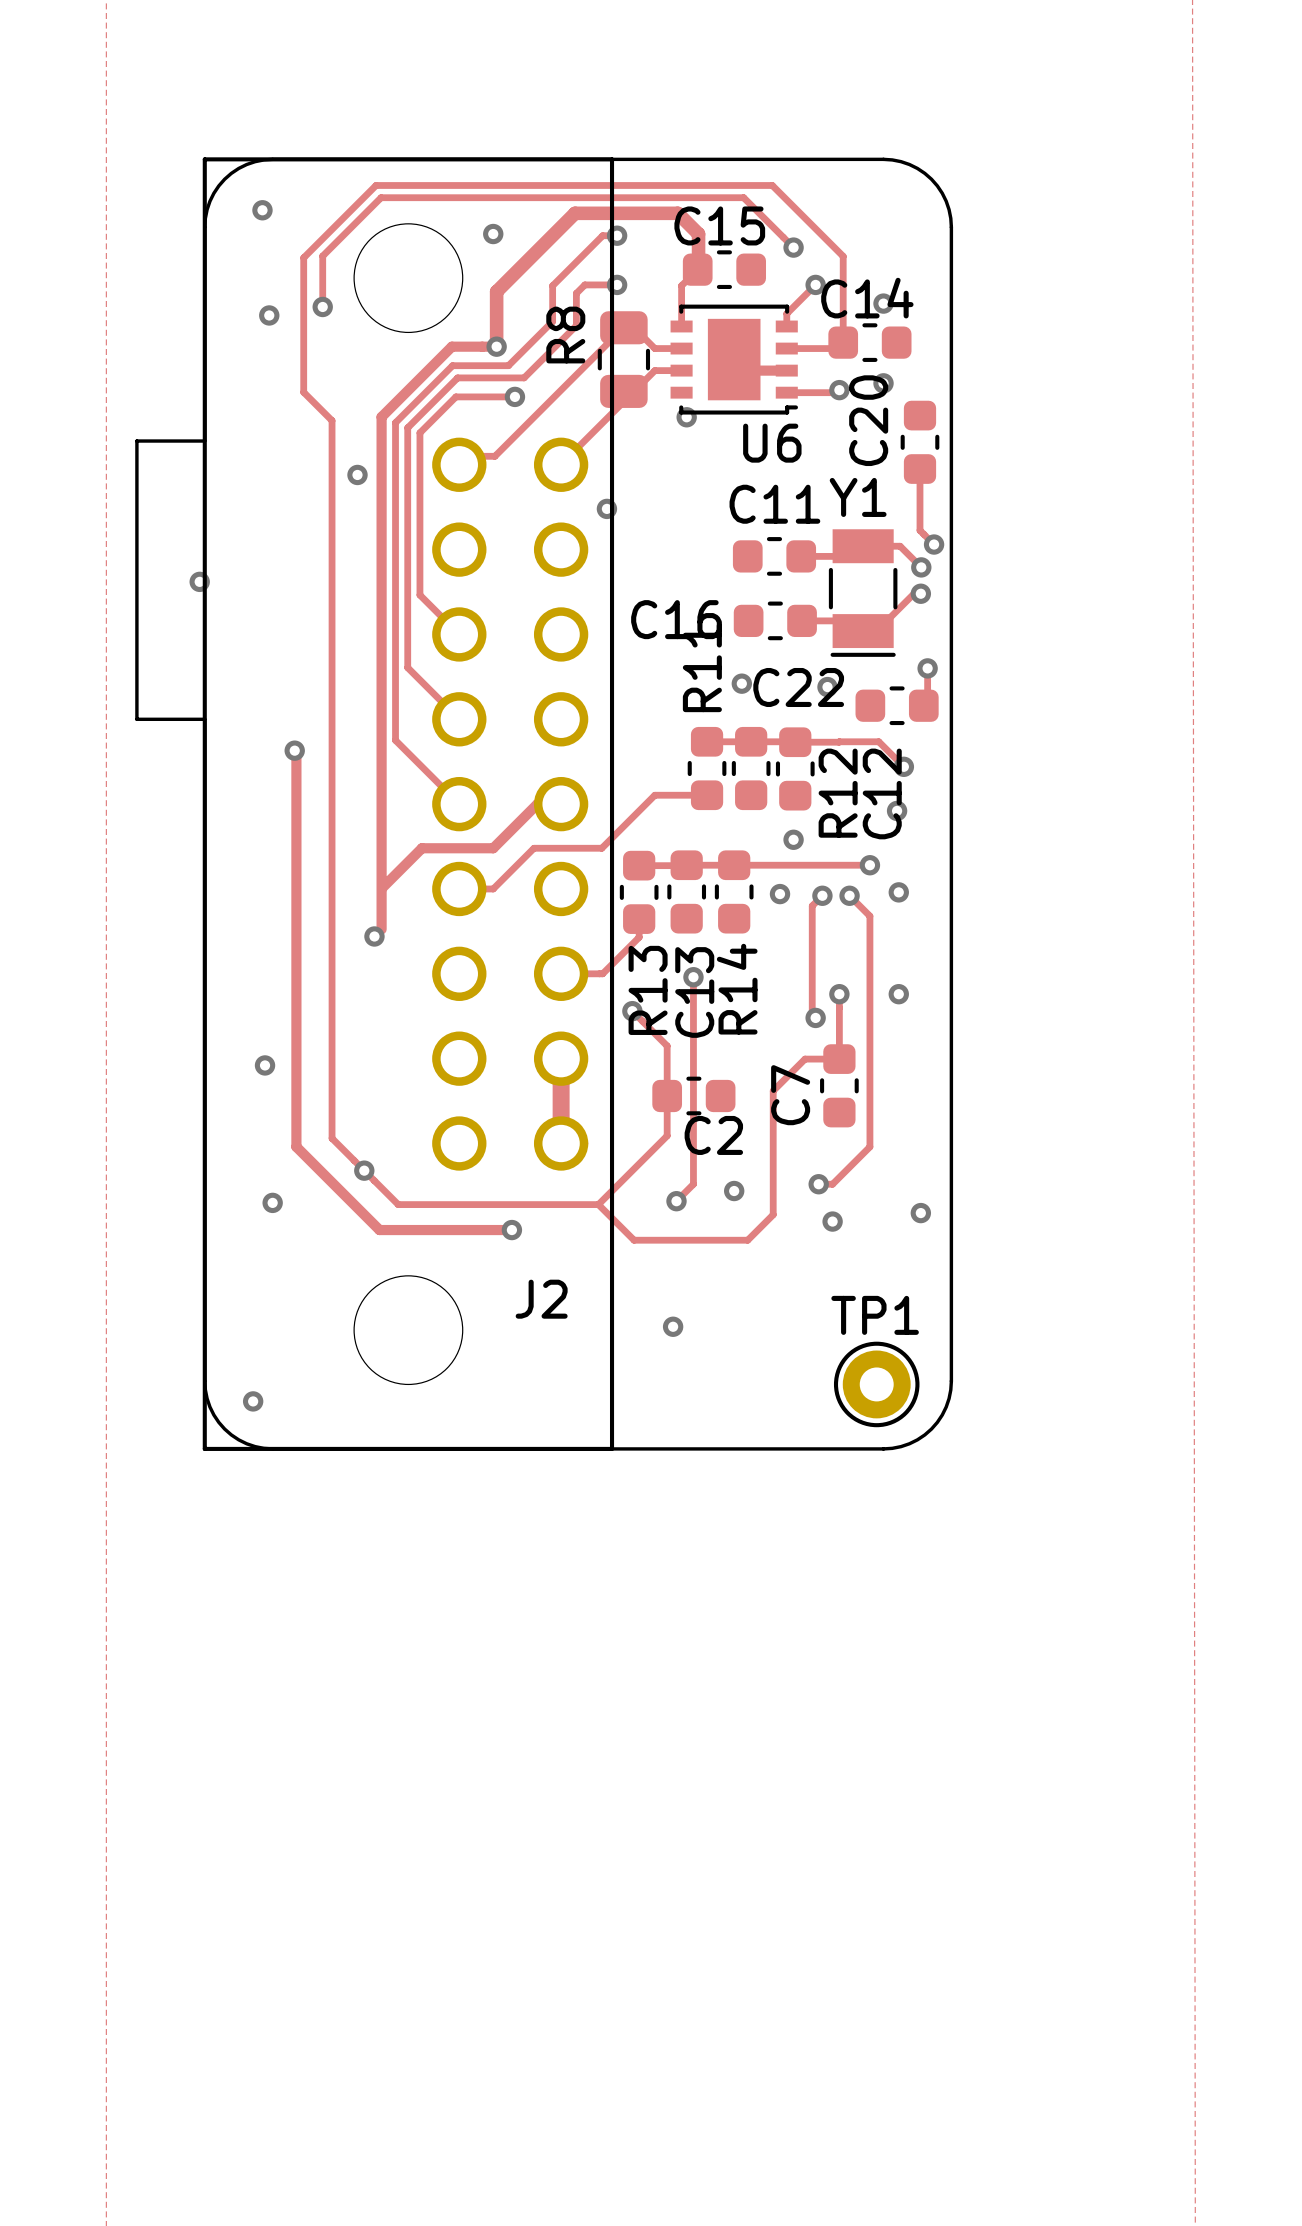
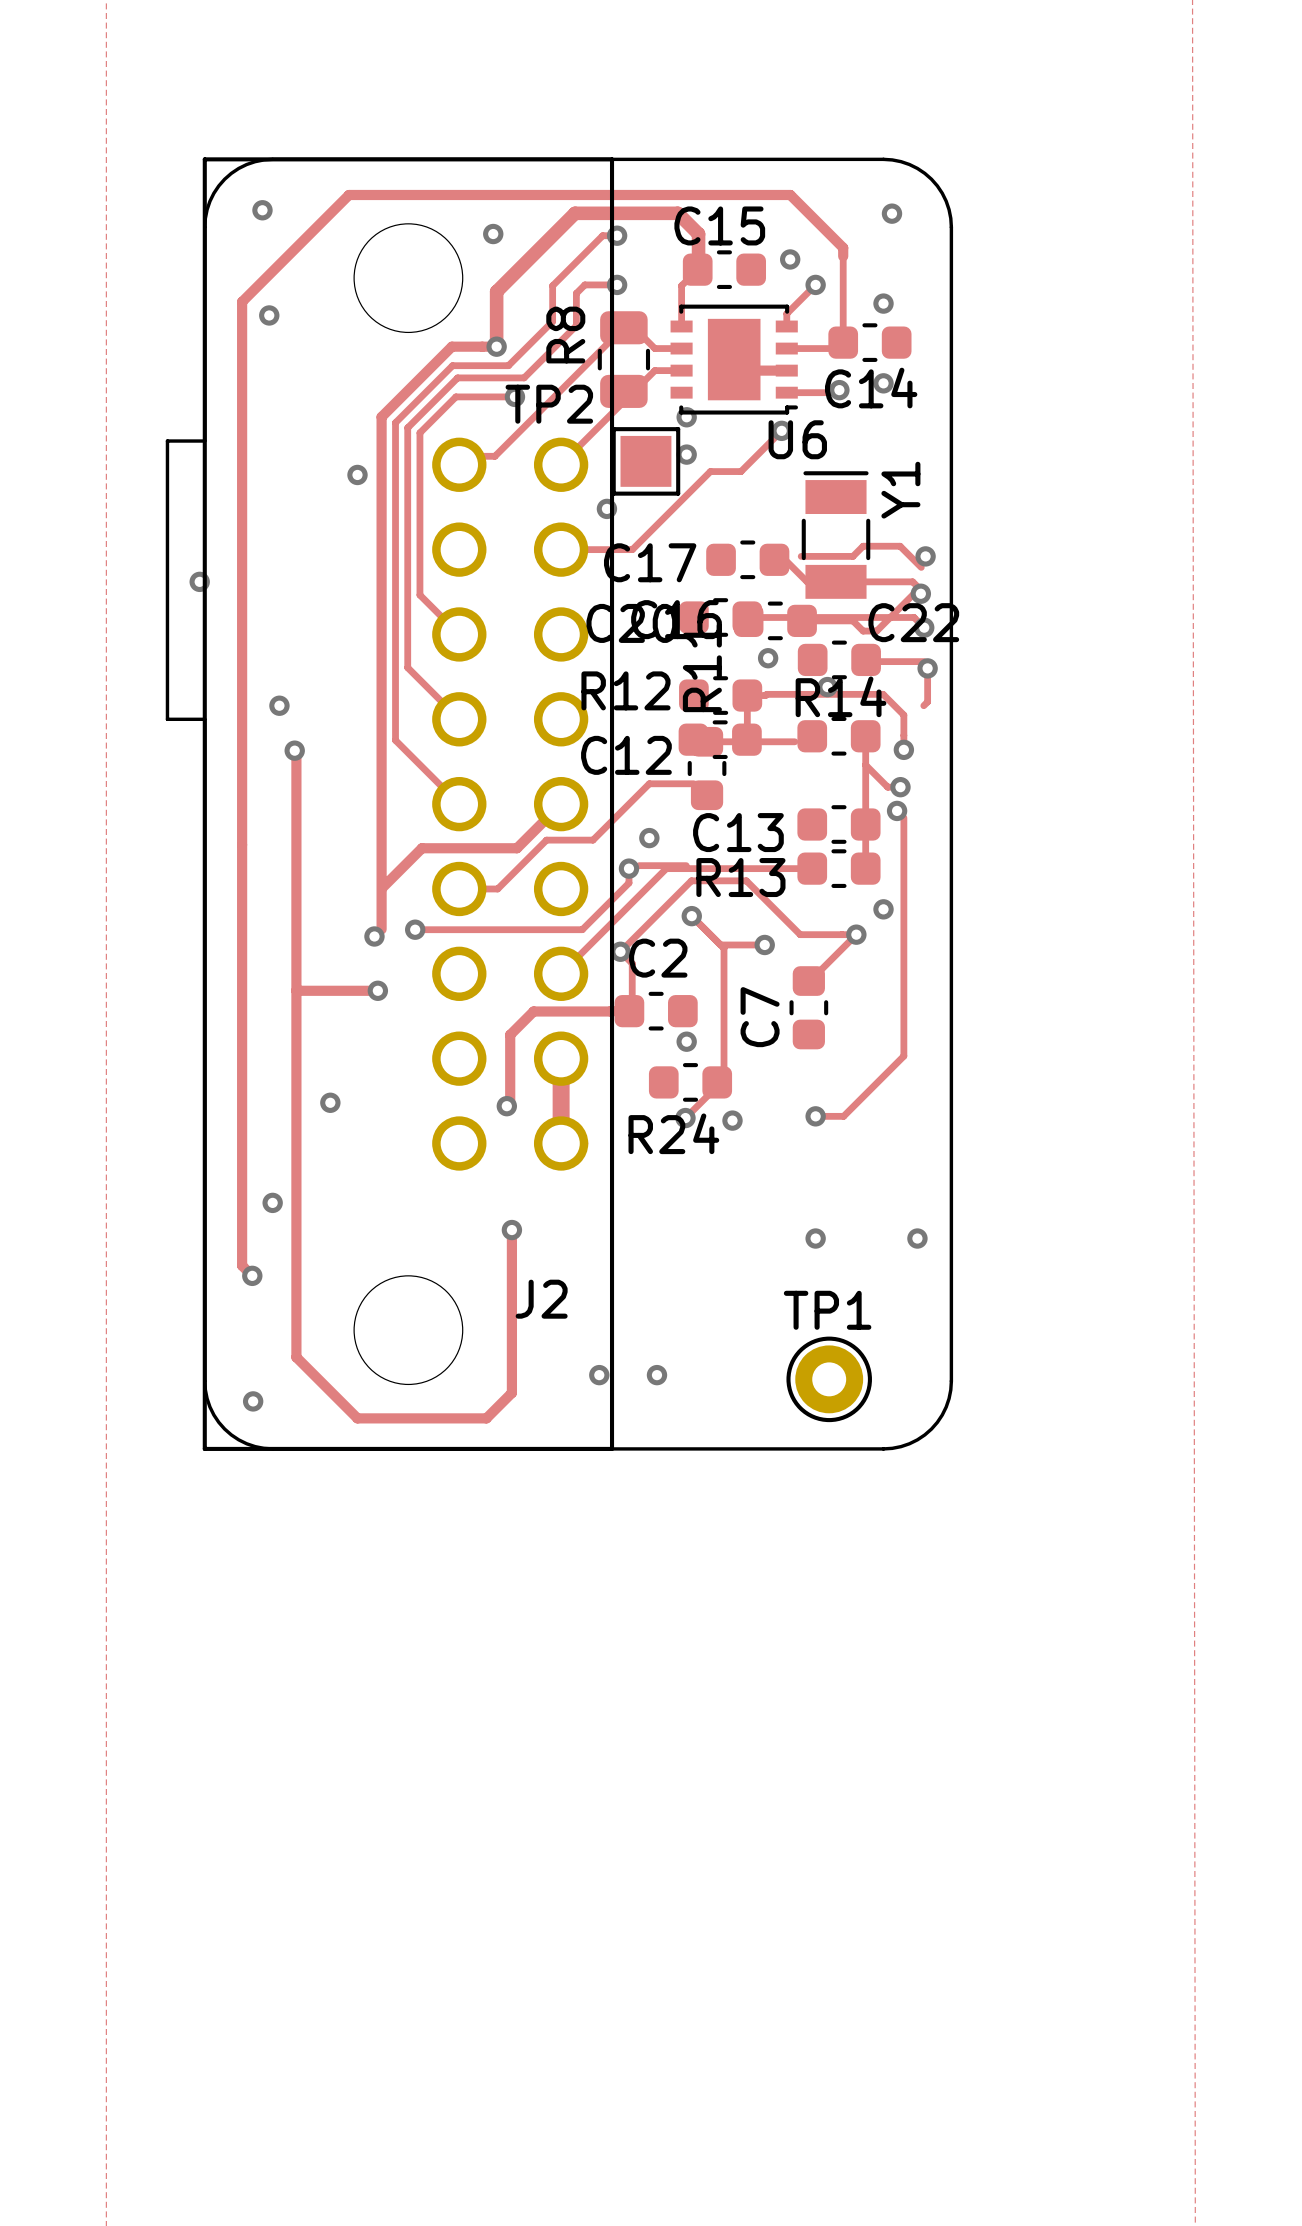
via: none -> (891, 213)
track: (793, 247) (743, 197) (381, 197) (322, 256) (322, 306) -> none
via position: (793, 247) -> (790, 259)
track: (843, 256) (772, 185) (376, 185) (303, 257) (303, 392) (332, 420) (332, 1138) (398, 1204) (598, 1204) -> (843, 256) (843, 247) (790, 194) (349, 194) (242, 301) (242, 1265) (252, 1275)
C14 name position: C14 (867, 298) -> C14 (871, 388)
via: (322, 306) -> none
track: none -> (781, 430) (740, 471) (710, 471) (632, 549) (561, 549)
via: none -> (781, 430)
board edge: (167, 441) (136, 441) (136, 719) (167, 719) -> (167, 441) (167, 719)
C20 rotation: 0° (919, 442) -> 90° clockwise (720, 617)
C20 position: (919, 442) -> (720, 617)
U6 name position: U6 (772, 443) -> U6 (797, 439)
via: none -> (686, 454)
TP2: none -> (645, 461)
track: (911, 477) (919, 469) (919, 530) (934, 544) -> none
Y1 name position: Y1 (858, 497) -> Y1 (900, 490)
C11 name: C11 (774, 504) -> C17 (650, 562)
via: (934, 544) -> none
C11 position: (774, 556) -> (747, 559)
via: none -> (925, 556)
track: none -> (774, 559) (785, 559) (807, 581) (912, 581) (925, 592)
via: (921, 567) -> none
Y1 rotation: 0° (863, 593) -> 180° (836, 535)
track: none -> (747, 617) (914, 617) (924, 627)
via: none -> (924, 627)
track: none -> (866, 659) (867, 661) (924, 661)
via position: (741, 683) -> (768, 658)
C22 name position: C22 (798, 687) -> C22 (913, 622)
via: none -> (279, 705)
C22 position: (897, 705) -> (839, 659)
track: none -> (865, 736) (865, 858)
track: none -> (747, 739) (747, 695) (883, 694) (903, 715) (903, 749)
track: (839, 741) (878, 741) (903, 766) -> none
track: (795, 742) (838, 742) -> (720, 944) (764, 944)
via: none -> (903, 749)
track: none -> (865, 765) (887, 787) (900, 787)
via: (903, 766) -> none
R12 rotation: 0° (751, 768) -> 90° clockwise (720, 695)
R12 position: (751, 768) -> (720, 695)
C12 rotation: 0° (795, 768) -> 90° clockwise (720, 739)
C12 position: (795, 768) -> (720, 739)
via: none -> (900, 787)
R12 name position: R12 (838, 793) -> R12 (625, 690)
C12 name position: C12 (882, 793) -> C12 (626, 755)
track: (707, 795) (654, 795) (601, 848) (533, 848) (493, 888) -> (693, 783) (649, 783) (593, 840) (546, 840) (497, 888) (493, 888)
track: (561, 804) (537, 804) (493, 848) -> (561, 804) (517, 848) (493, 848)
track: none -> (903, 817) (903, 1056) (843, 1116) (815, 1116)
via: none -> (649, 838)
via: (793, 839) -> none
track: (686, 865) (869, 865) -> none
via: (869, 865) -> none
track: none -> (628, 868) (628, 883) (582, 929) (415, 929)
via: none -> (628, 868)
C13 rotation: 0° (686, 891) -> 90° clockwise (838, 824)
C13 position: (686, 891) -> (838, 824)
R14 rotation: 0° (734, 891) -> 90° clockwise (838, 736)
R14 position: (734, 891) -> (838, 736)
R13 rotation: 0° (639, 892) -> 90° clockwise (838, 868)
R13 position: (639, 892) -> (838, 868)
via position: (898, 892) -> (883, 909)
via: (780, 894) -> none
track: (822, 895) (812, 905) (812, 1014) (815, 1017) -> none
via: (822, 895) -> none
track: (849, 895) (869, 916) (869, 1146) (832, 1184) (818, 1184) -> none
via: (849, 895) -> none
track: none -> (691, 916) (724, 948) (724, 1079) (685, 1118)
via: none -> (691, 916)
track: (639, 919) (639, 937) (602, 973) (561, 973) -> (812, 868) (666, 868) (561, 973)
via: none -> (415, 929)
via: none -> (856, 934)
via: none -> (764, 944)
via: none -> (620, 951)
track: (693, 977) (693, 1184) (676, 1201) -> none
via: (693, 977) -> none
track: none -> (808, 981) (856, 934) (800, 934) (746, 880) (691, 880) (620, 951) (632, 963) (632, 1012) (635, 1012)
R14 name position: R14 (737, 989) -> R14 (841, 696)
track: none -> (296, 990) (377, 990)
via: none -> (377, 990)
track: (839, 994) (839, 1059) (805, 1059) (773, 1090) (773, 1214) (747, 1240) (634, 1240) (598, 1204) -> none
via: (839, 994) -> none
via: (898, 994) -> none
track: none -> (610, 1011) (533, 1011) (510, 1034) (510, 1102) (506, 1106)
track: (632, 1011) (667, 1045) (667, 1135) (598, 1204) -> none
via: (632, 1011) -> none
via: (815, 1017) -> none
via: none -> (686, 1041)
via: (265, 1065) -> none
R24: none -> (690, 1082)
C7 position: (839, 1085) -> (808, 1007)
C2 position: (693, 1095) -> (656, 1011)
via: none -> (330, 1102)
via: none -> (506, 1106)
via: none -> (815, 1116)
via: none -> (685, 1118)
via: none -> (732, 1120)
C2 name position: C2 (713, 1135) -> C2 (658, 958)
track: (296, 1146) (379, 1230) (511, 1230) -> (296, 1146) (296, 1357) (357, 1418) (486, 1418) (511, 1392) (511, 1230)
via: (364, 1170) -> none
via: (818, 1184) -> none
via: (734, 1191) -> none
via: (676, 1201) -> none
via position: (920, 1213) -> (917, 1238)
via position: (832, 1221) -> (815, 1238)
via: none -> (252, 1275)
via: (673, 1326) -> none
via: none -> (599, 1375)
via: none -> (656, 1375)
TP1 position: (876, 1384) -> (829, 1379)

